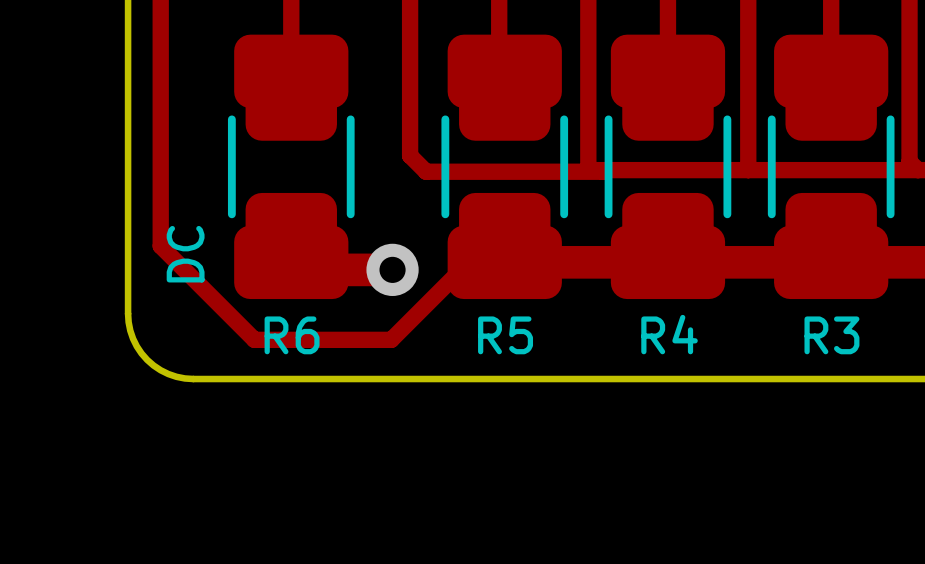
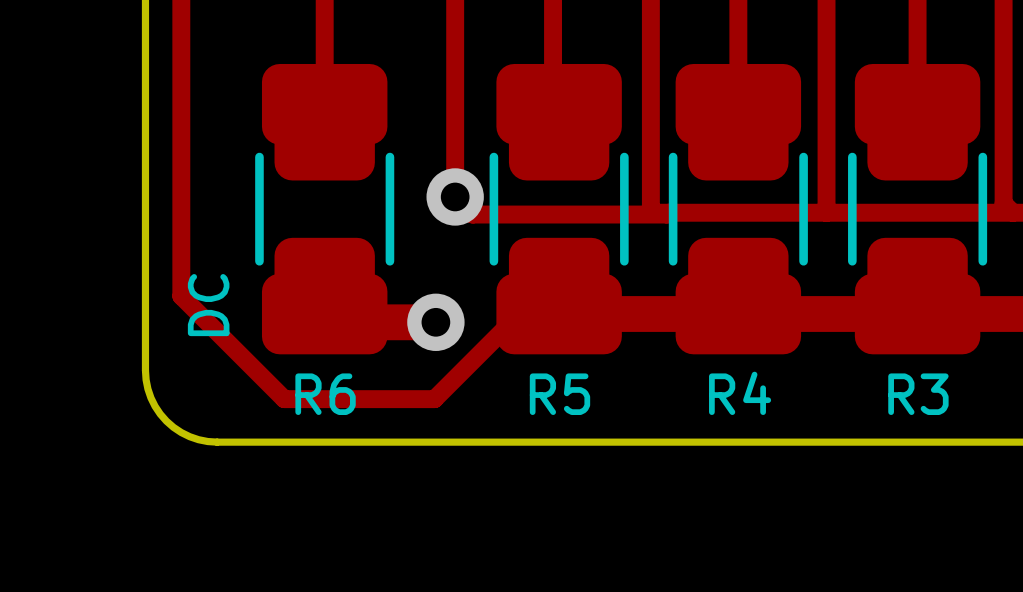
via: none -> (455, 196)

